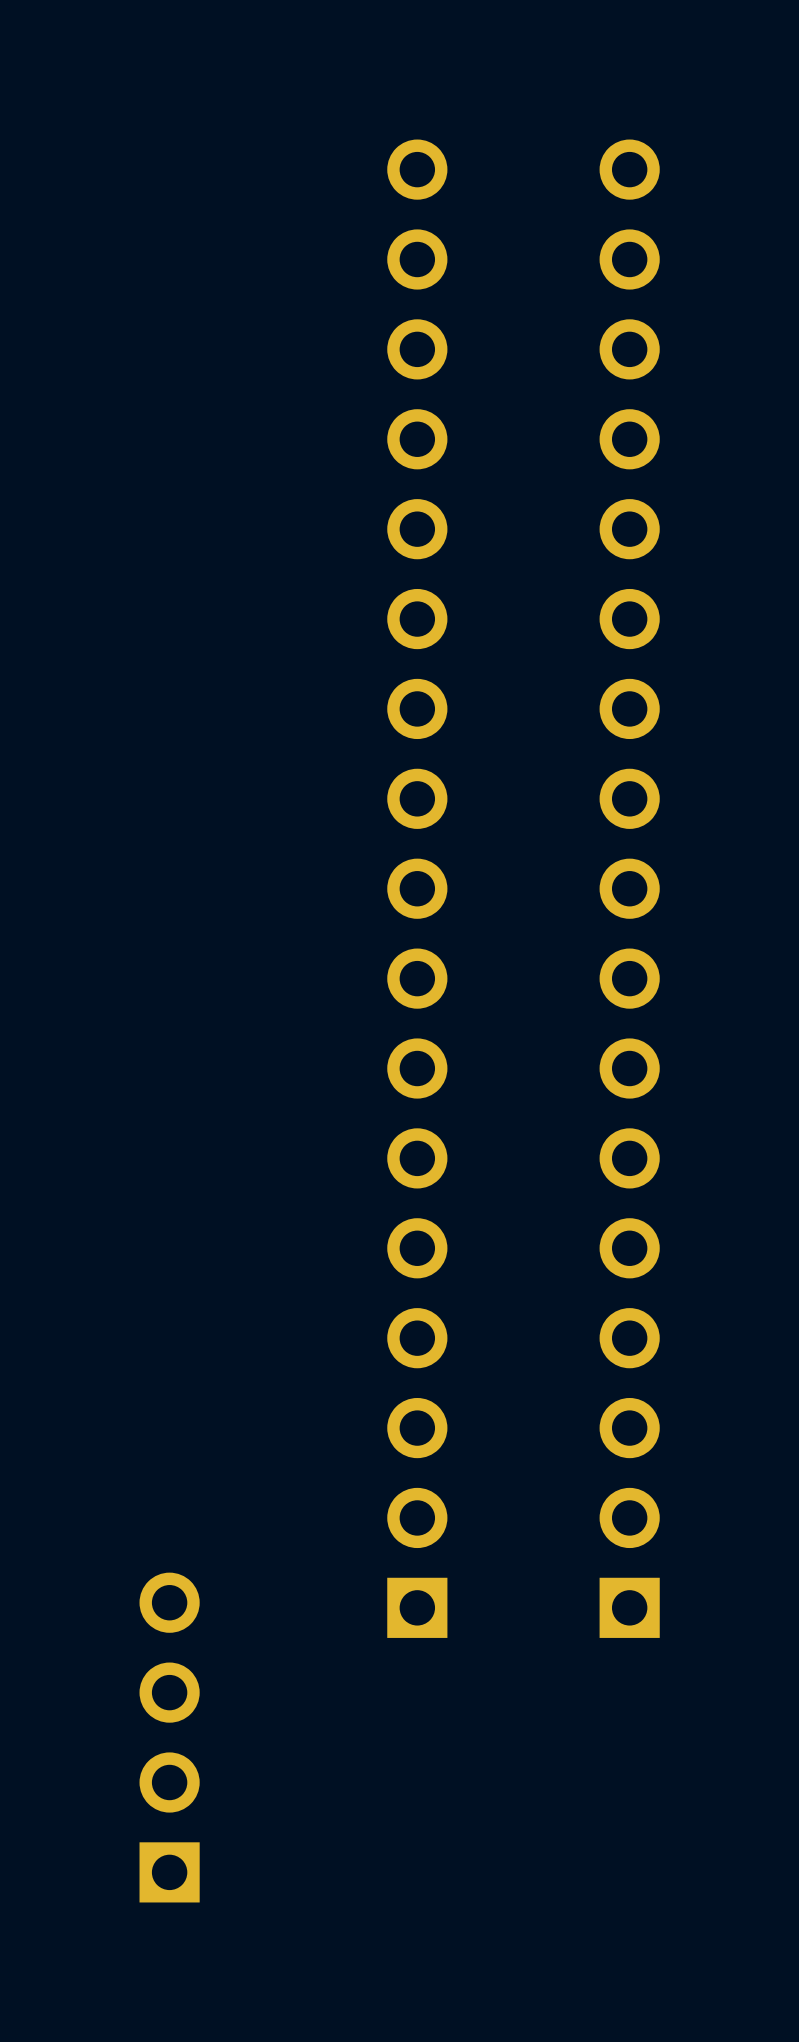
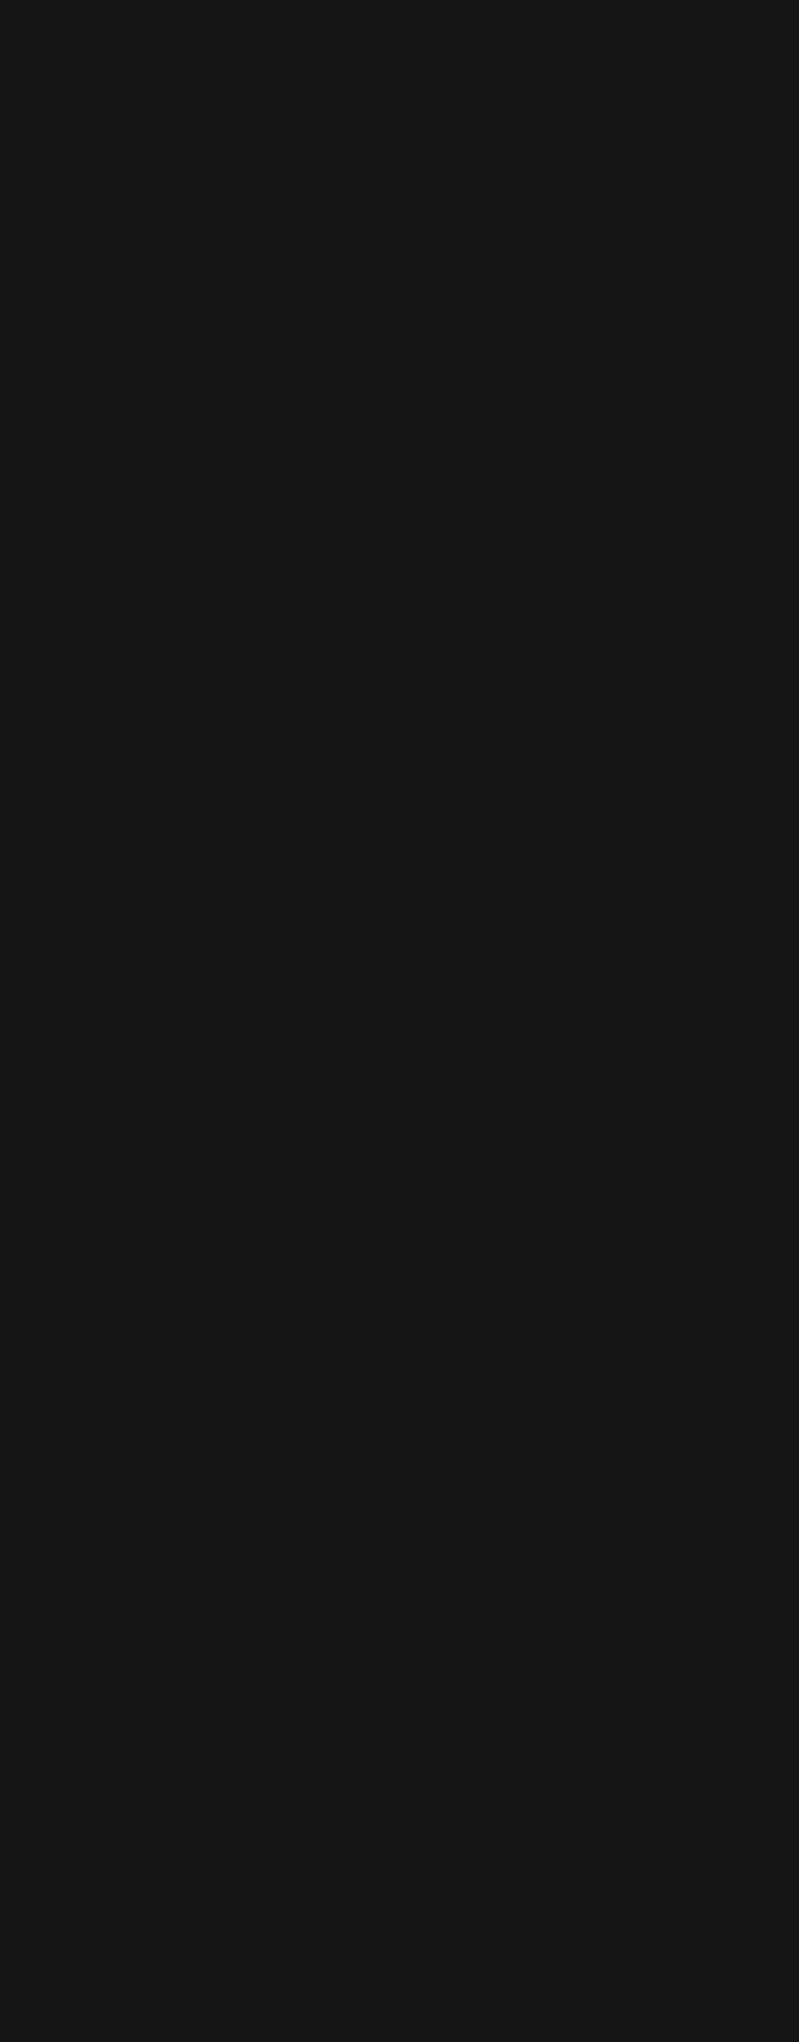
part: (417, 888) -> none
part: (629, 888) -> none
part: (169, 1737) -> none

